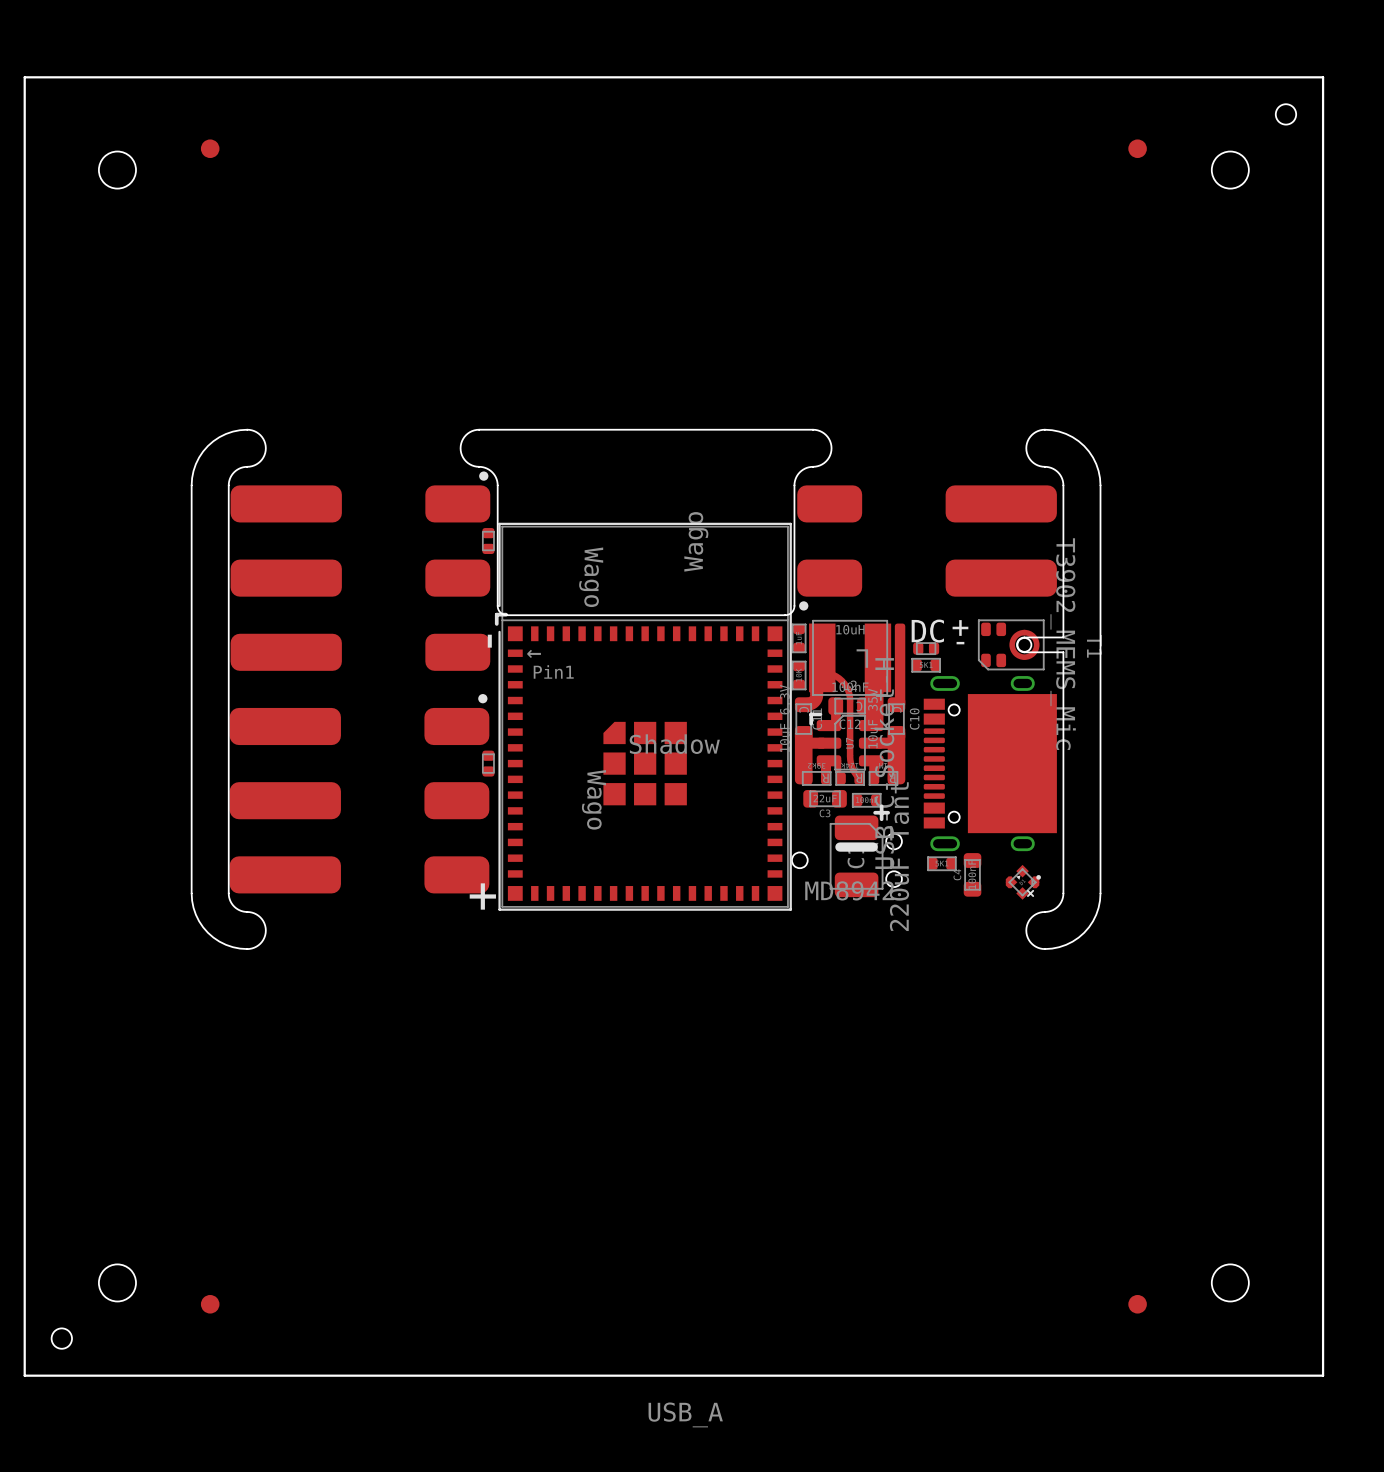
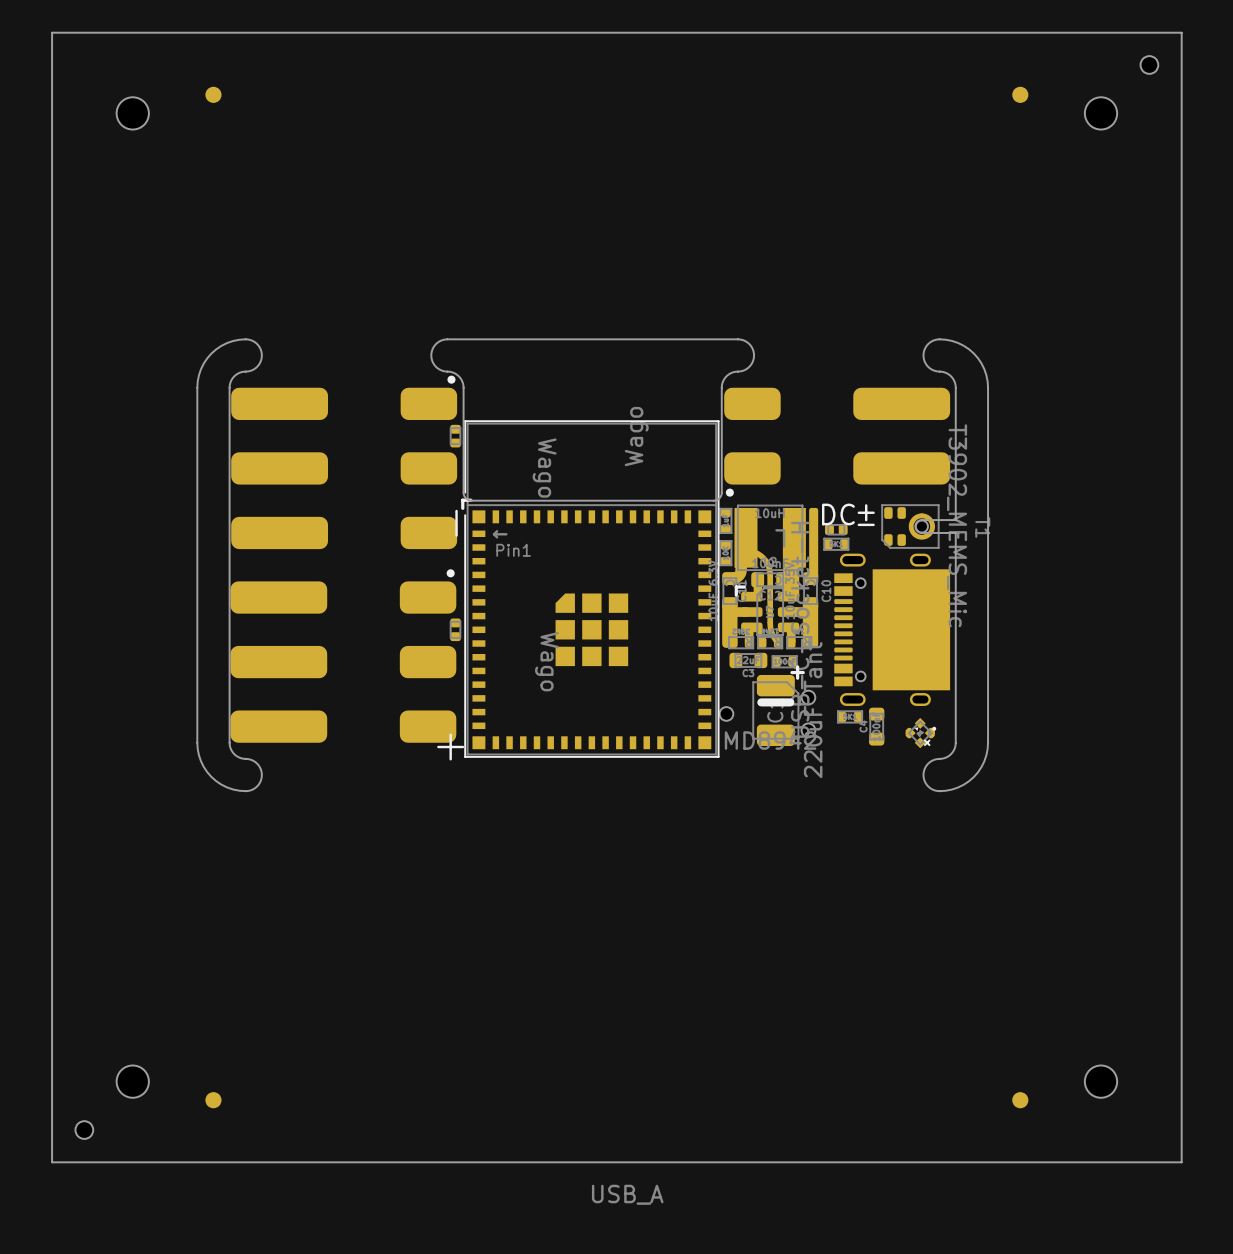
drawing: [629, 734, 720, 754] -> none

